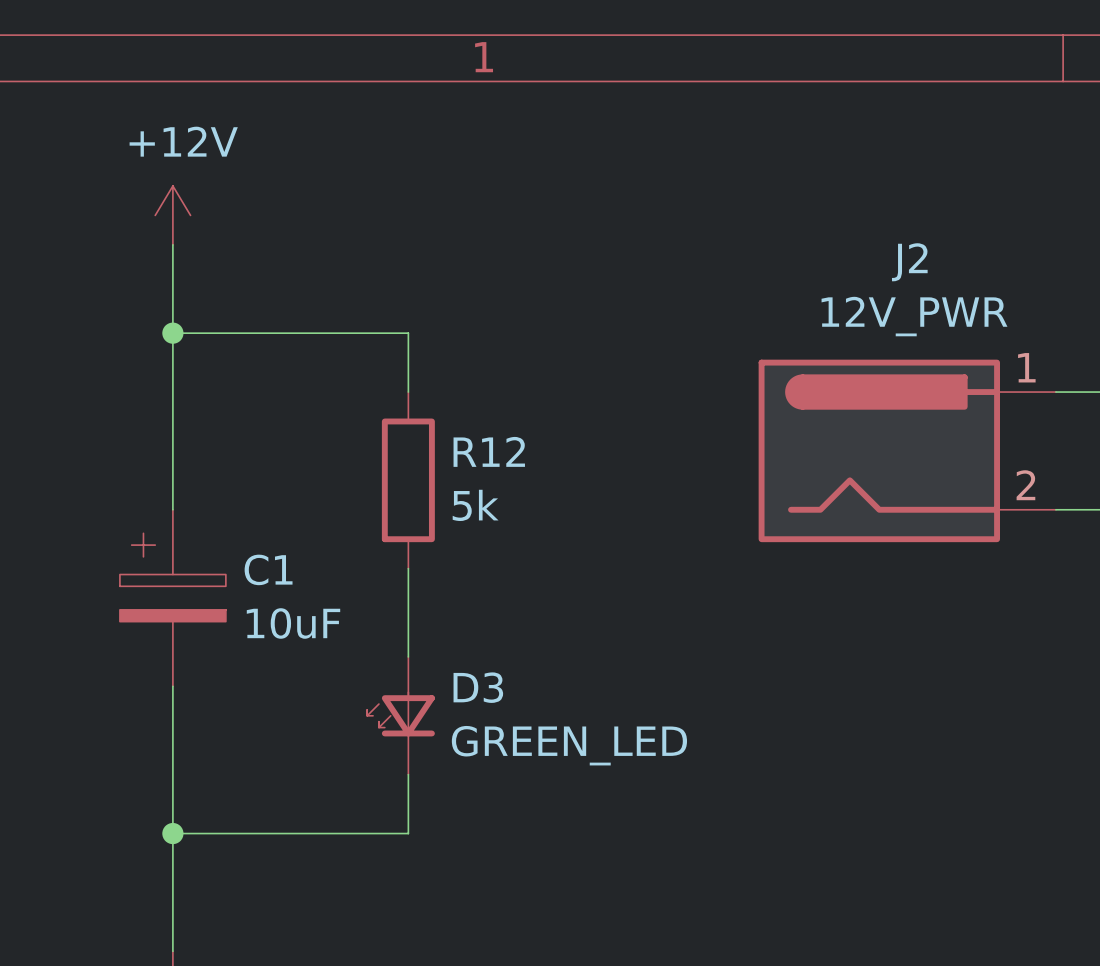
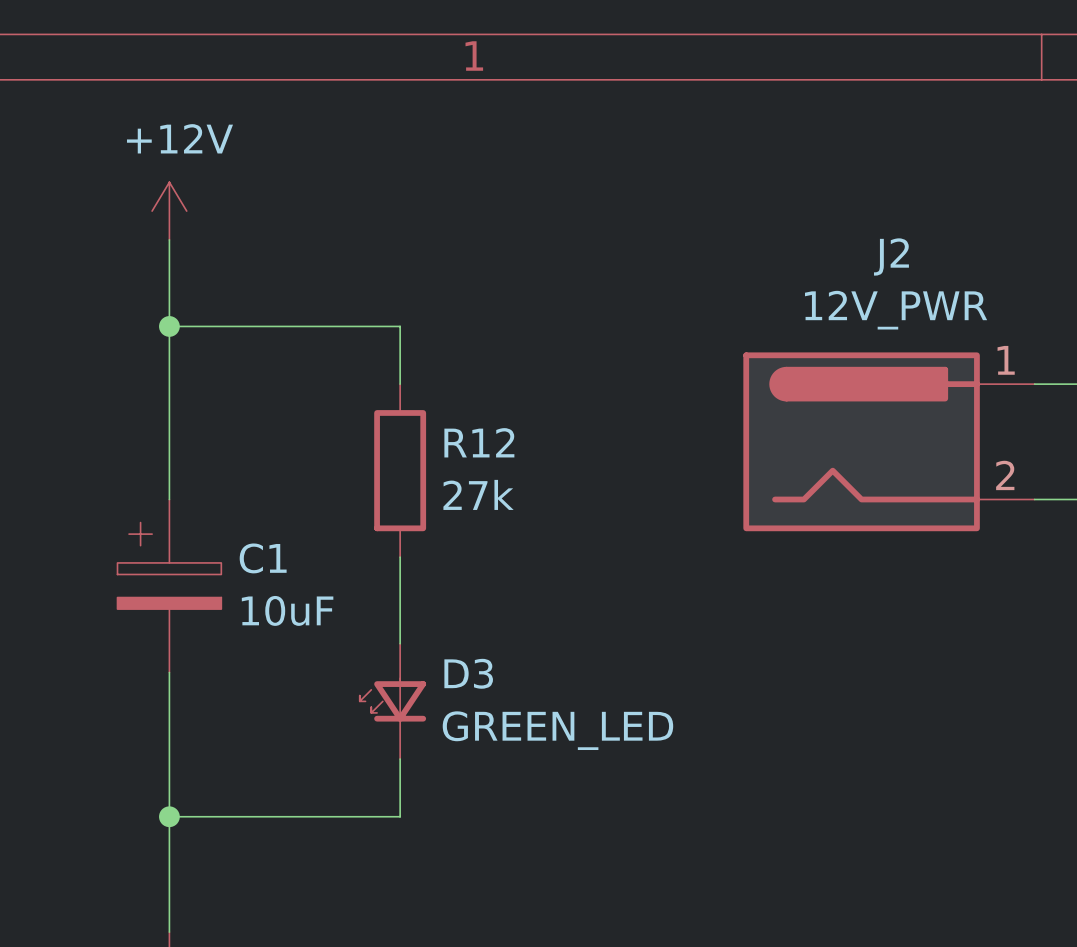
R12 value: 5k (475, 505) -> 27k (478, 494)

